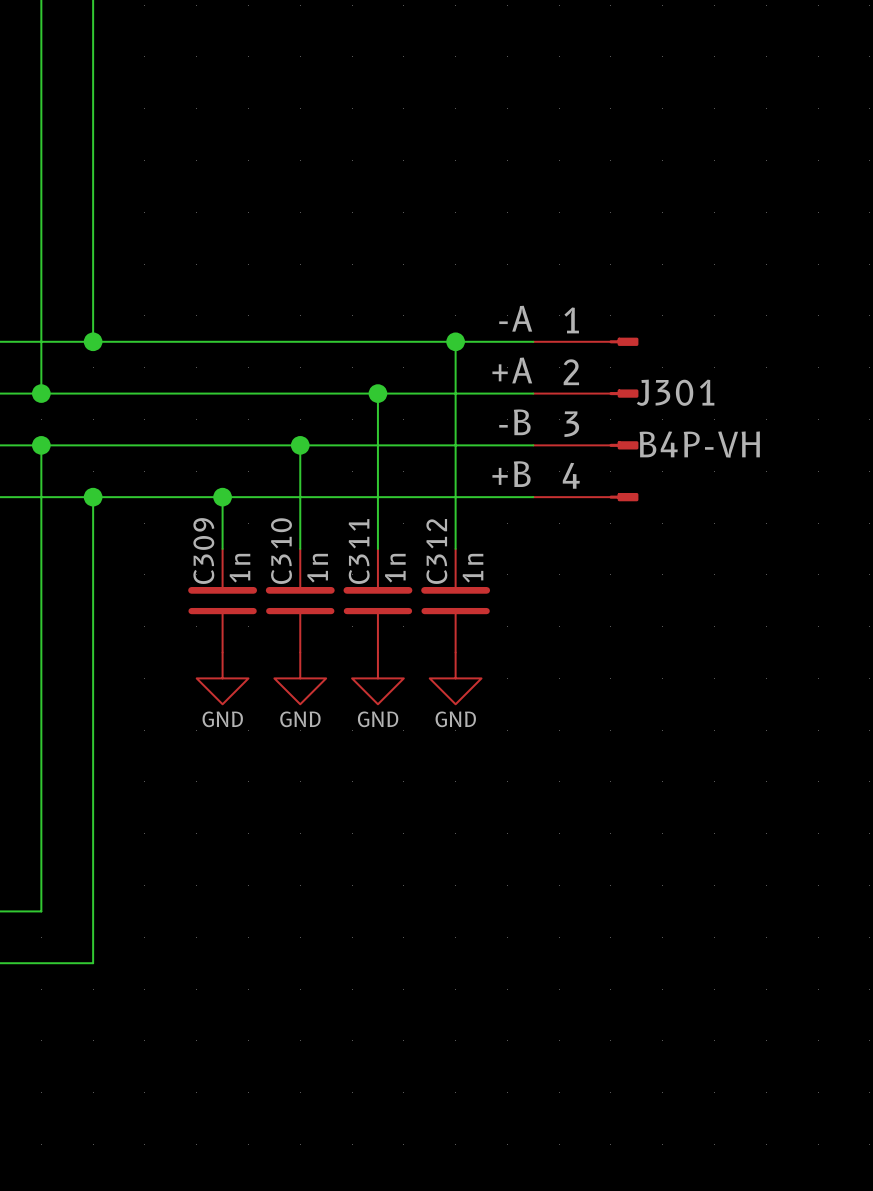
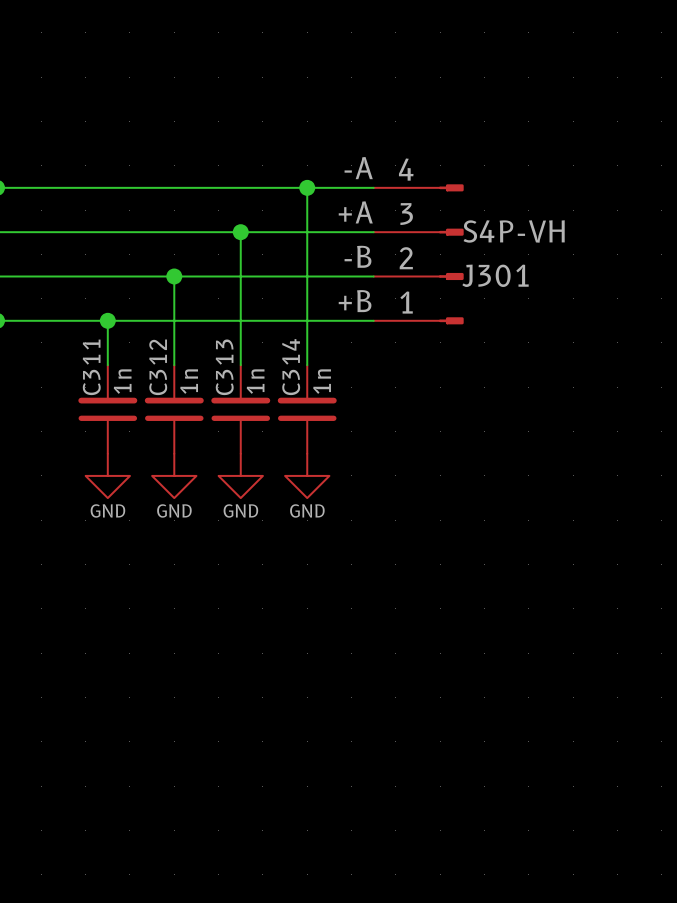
J301 flip: as is (623, 419) -> up-down (451, 254)
J301 value: B4P-VH (699, 444) -> S4P-VH (514, 231)
C309 name: C309 (203, 551) -> C311 (91, 367)
C310 name: C310 (281, 551) -> C312 (158, 367)
C311 name: C311 (359, 551) -> C313 (224, 367)
C312 name: C312 (436, 551) -> C314 (291, 367)

